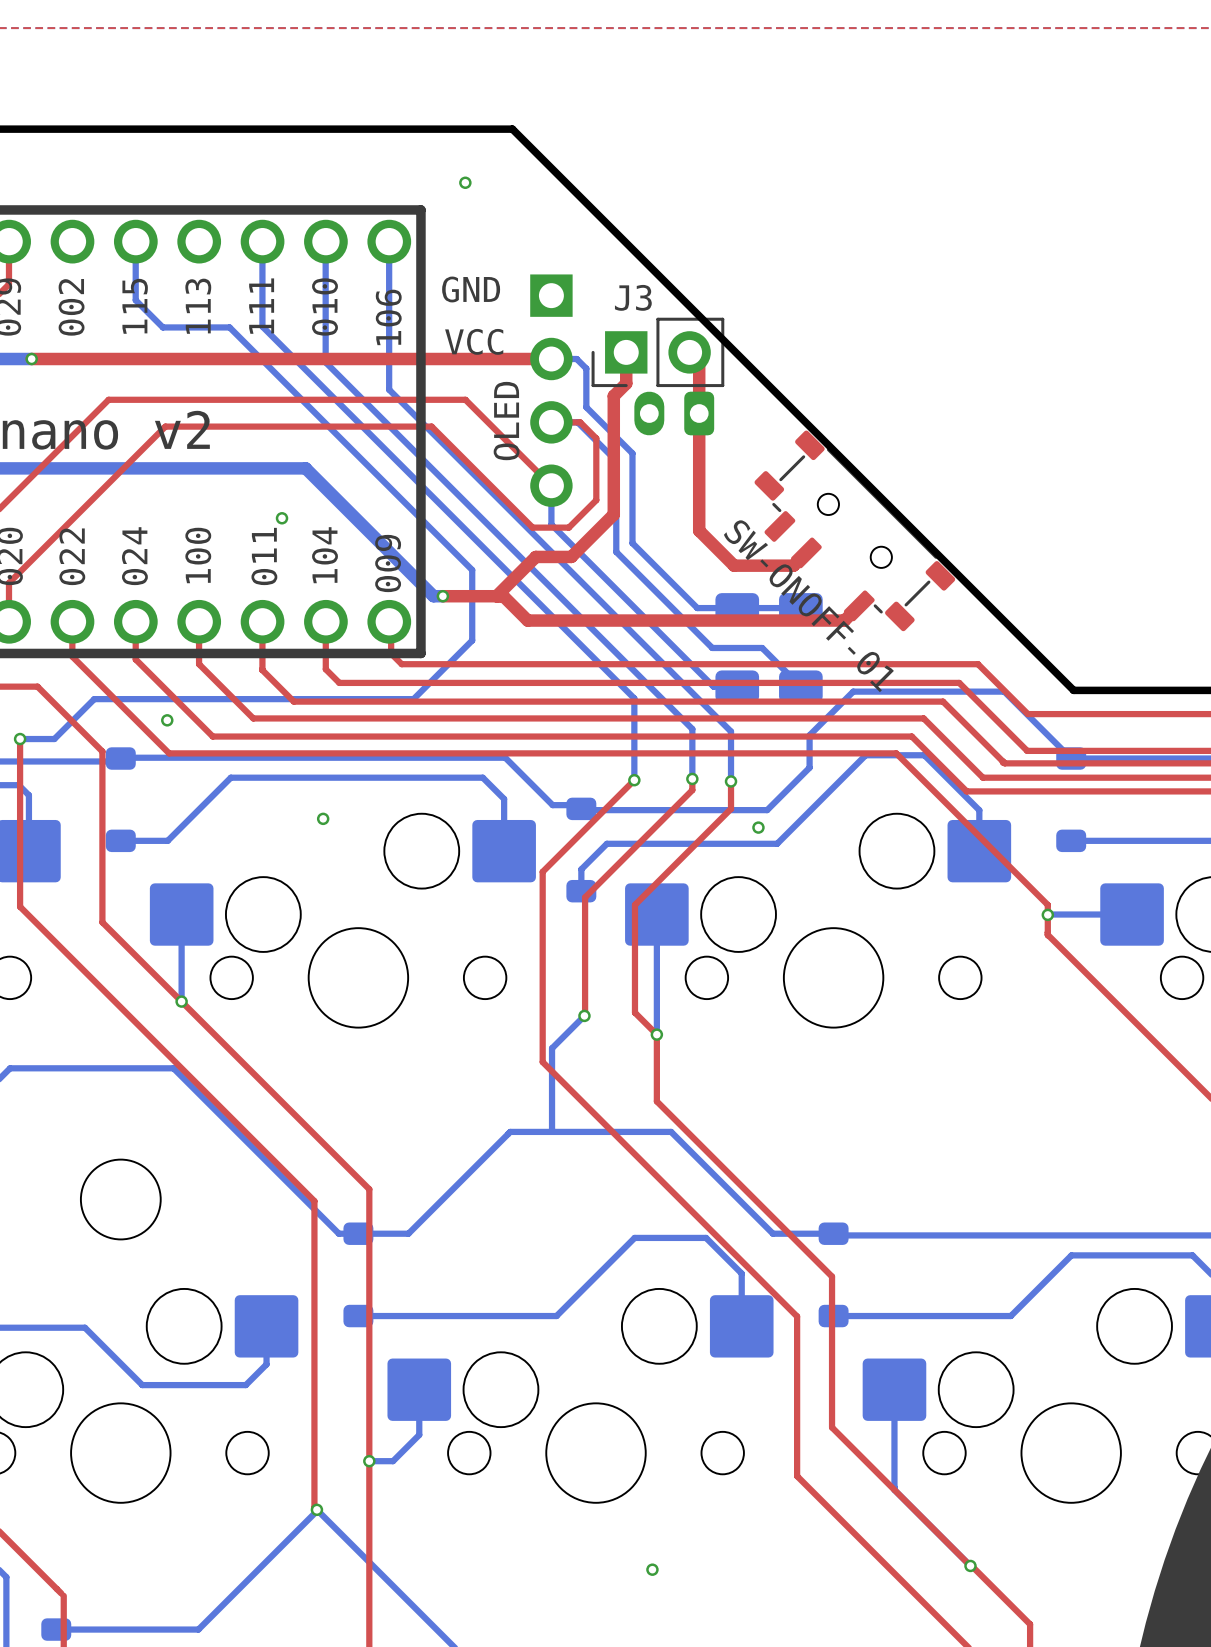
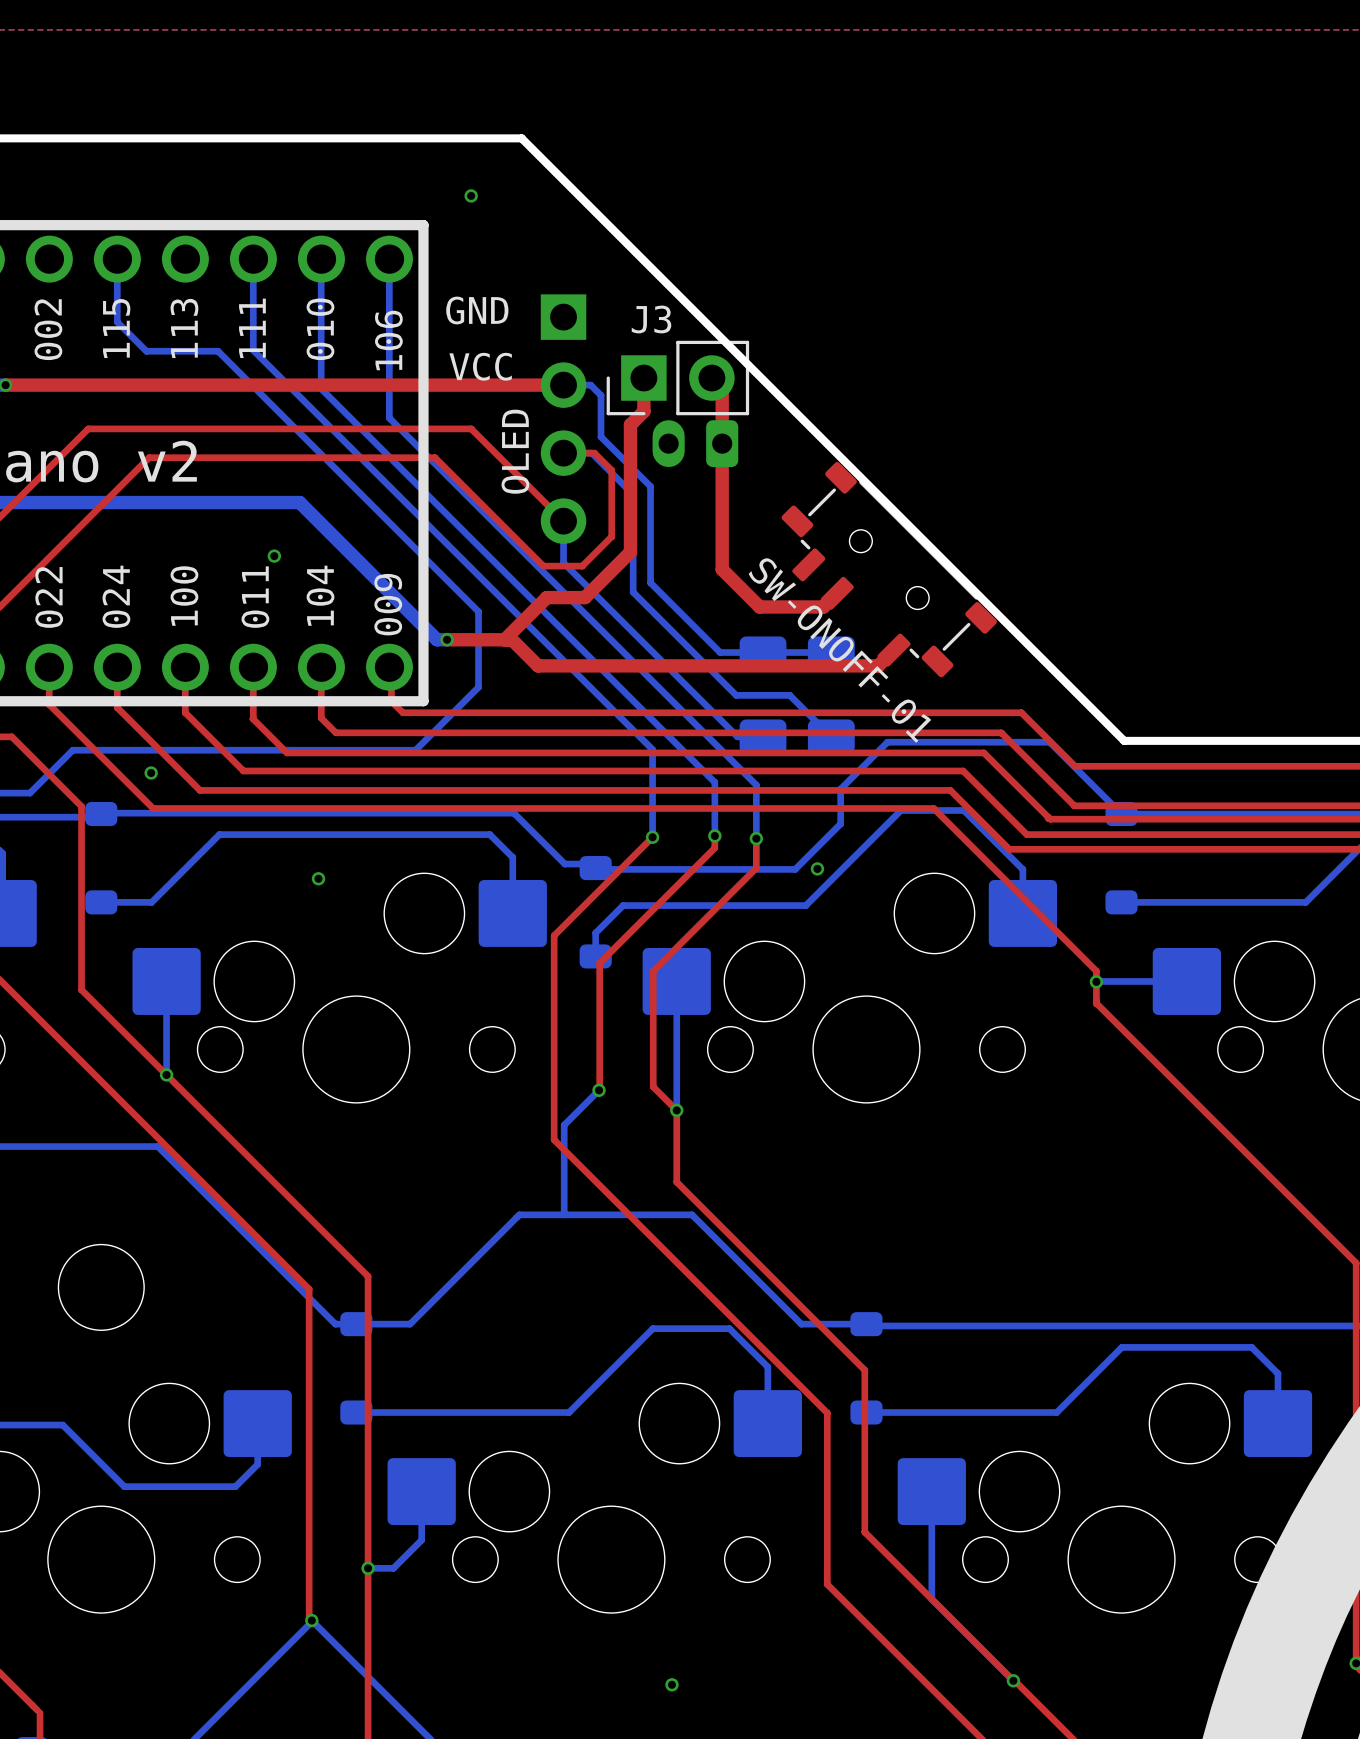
via position: (758, 827) -> (817, 868)

